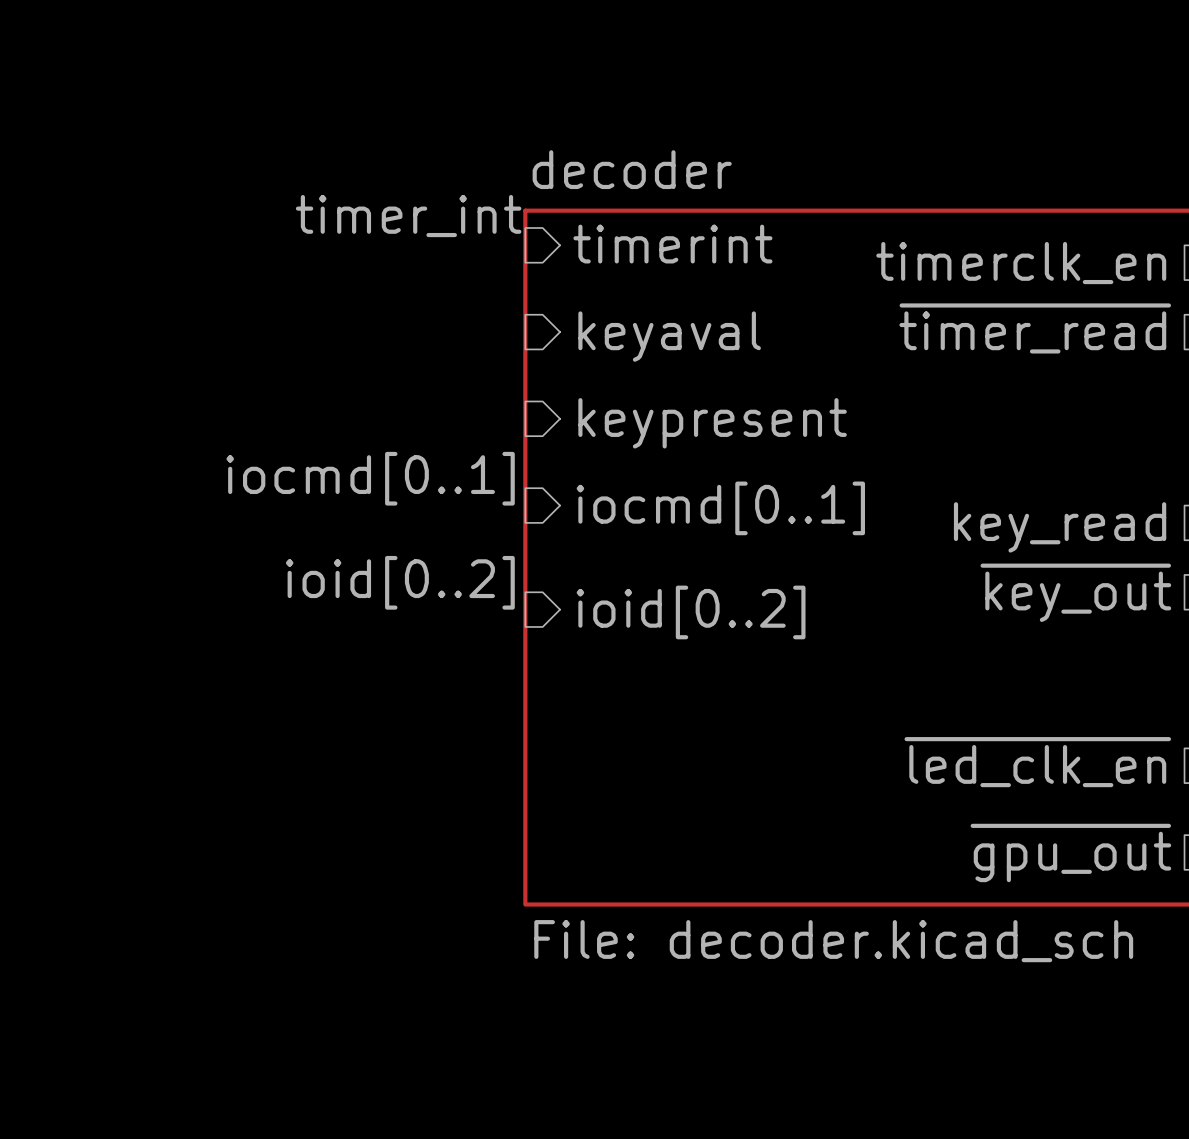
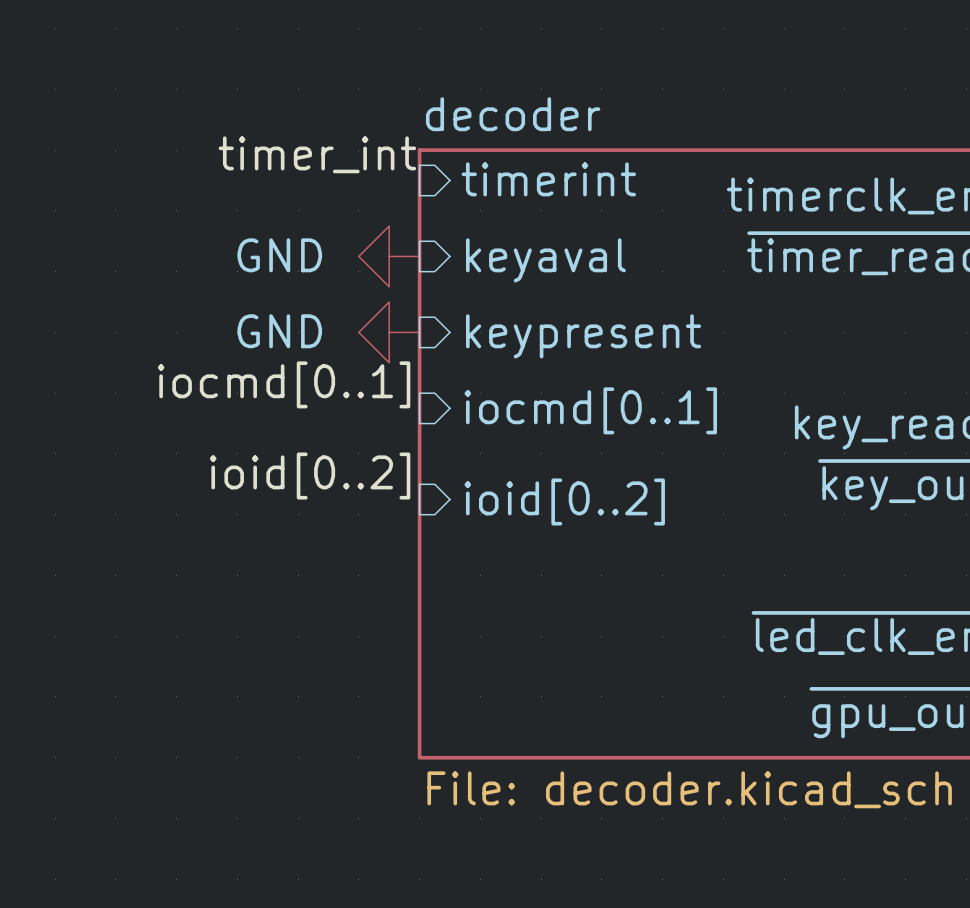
power symbol: none -> GND (389, 256)
power symbol: none -> GND (389, 332)

